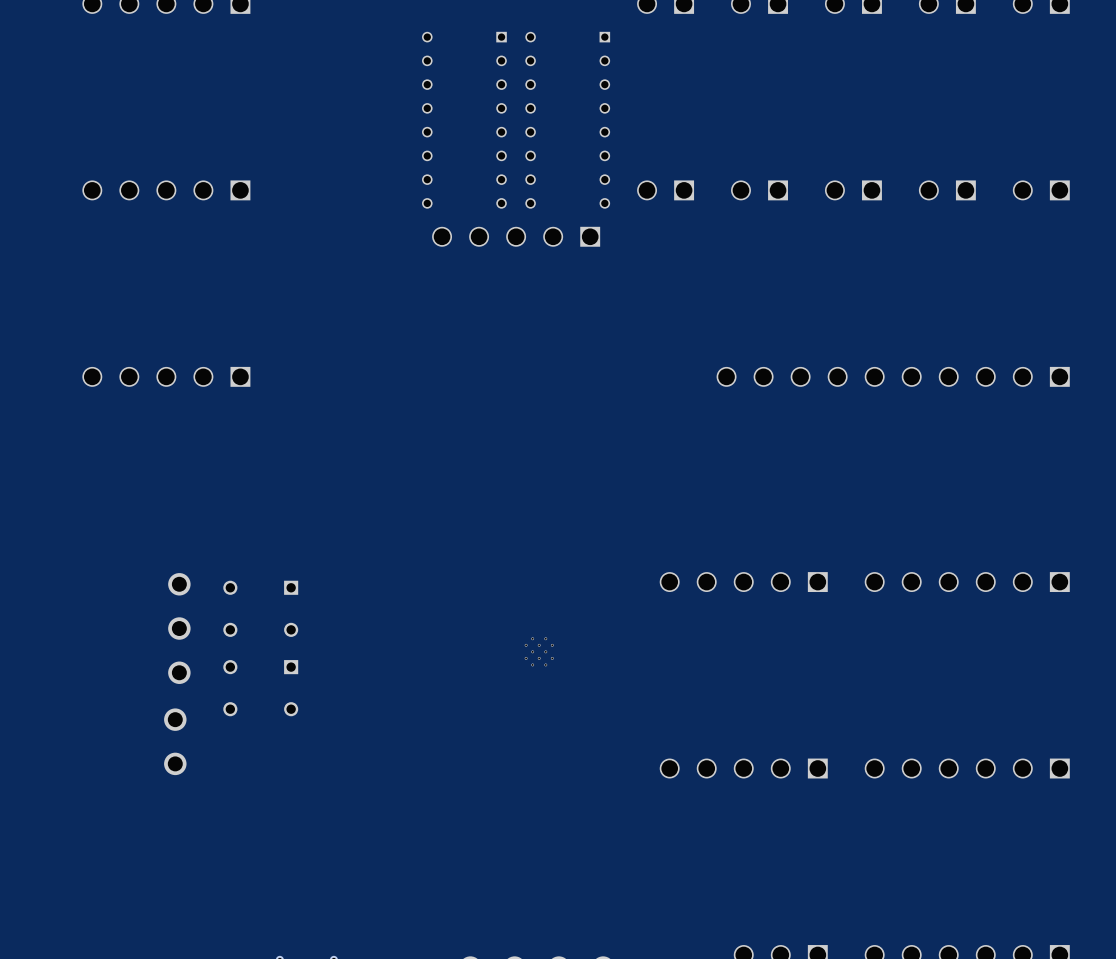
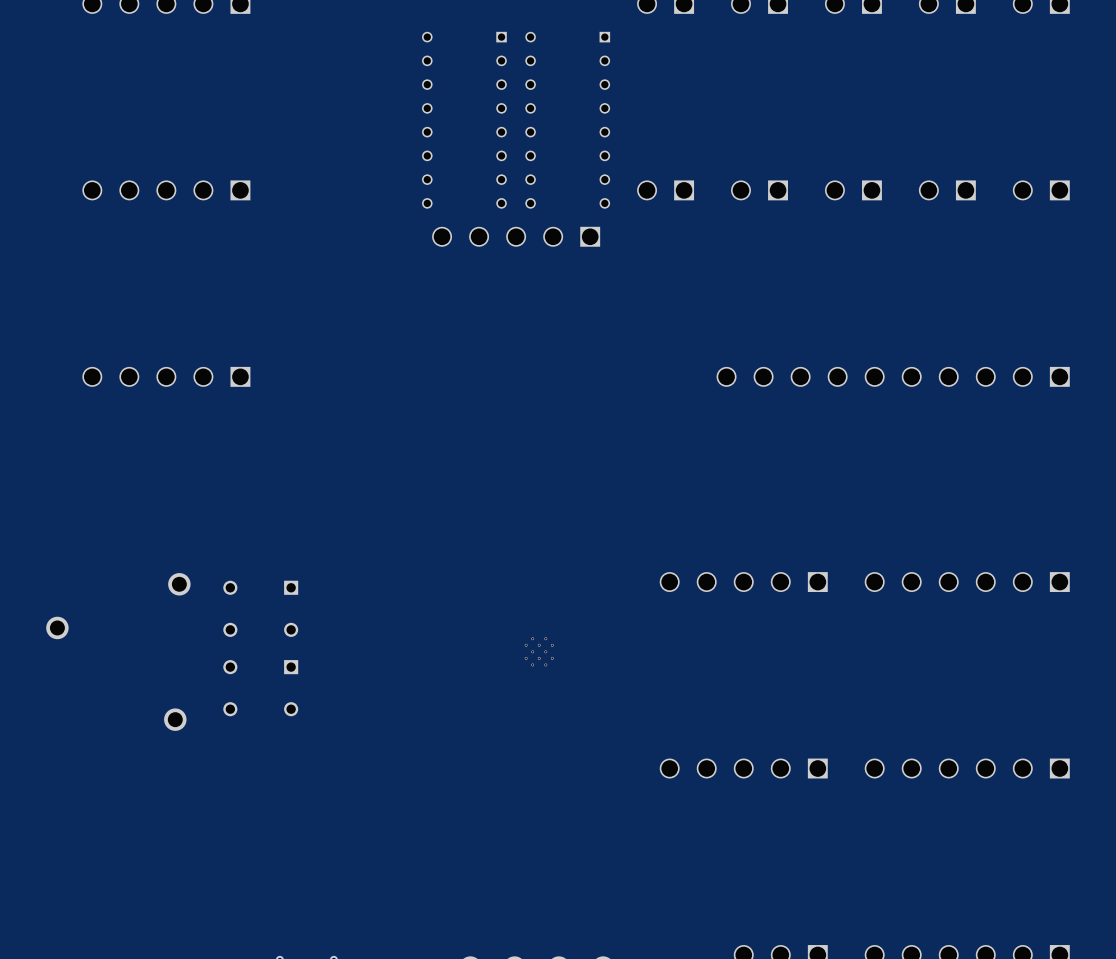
part: none -> (57, 627)
part: (179, 628) -> none
part: (179, 672) -> none
part: (175, 763) -> none

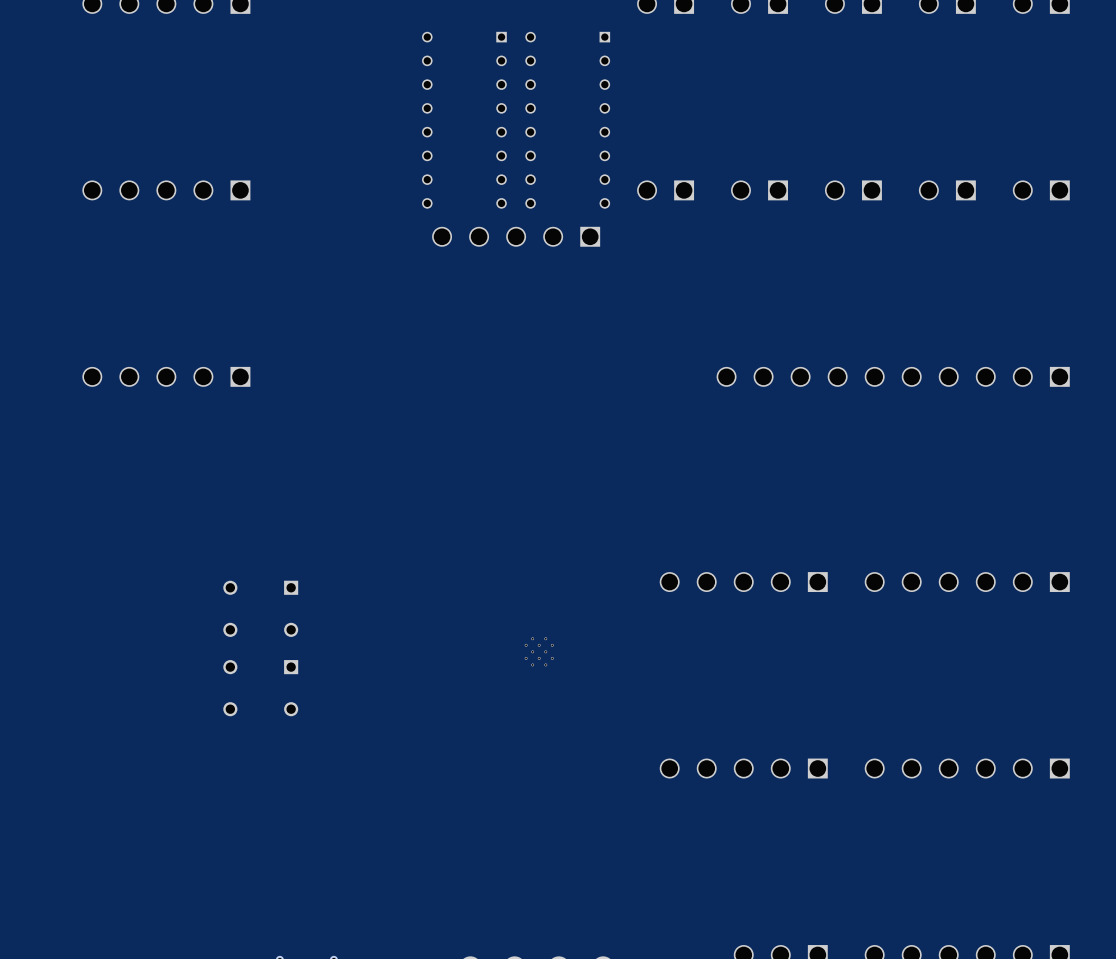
part: (179, 584) -> none
part: (57, 627) -> none
part: (175, 719) -> none

